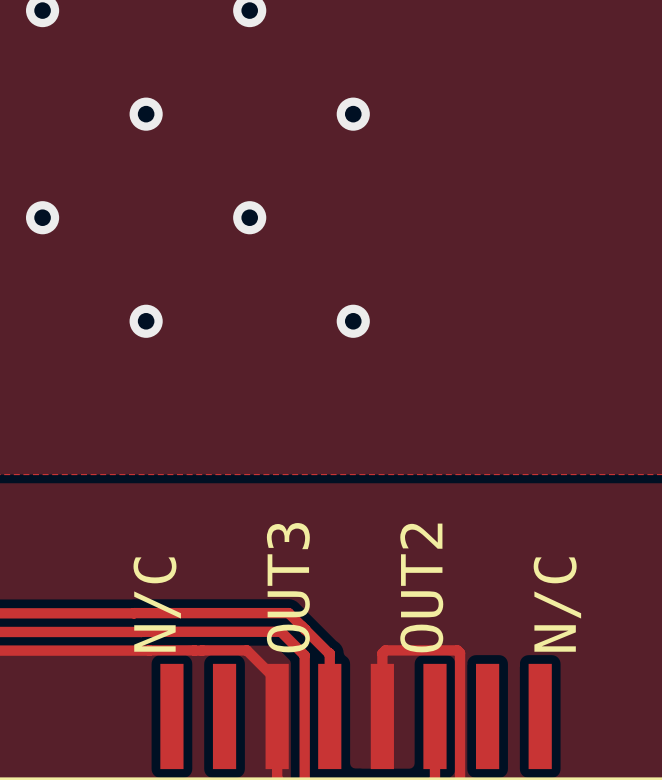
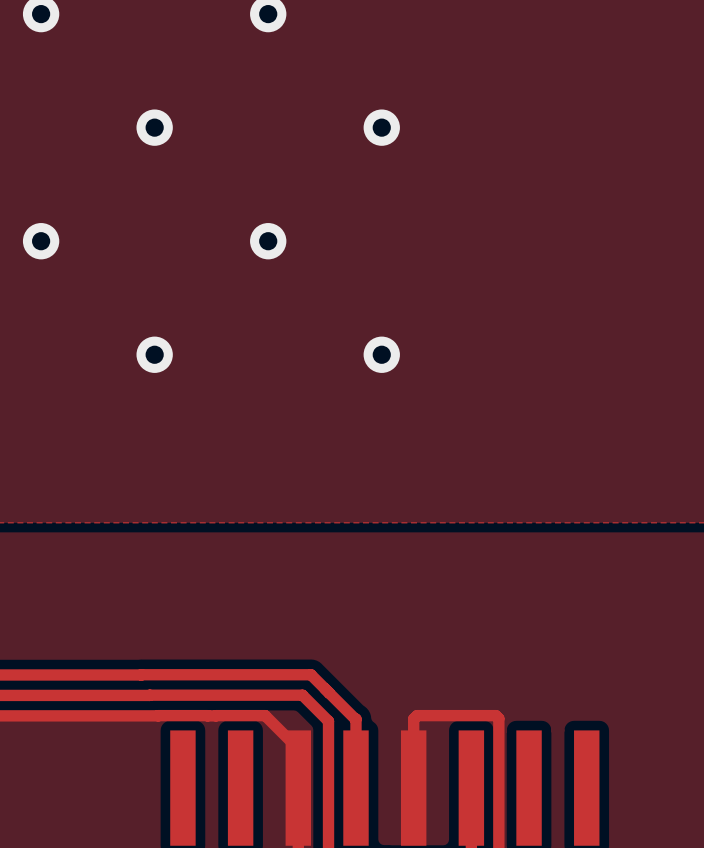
text: OUT3 (288, 587) -> none
text: OUT2 (421, 587) -> none
text: N/C (157, 604) -> none
text: N/C (557, 604) -> none

